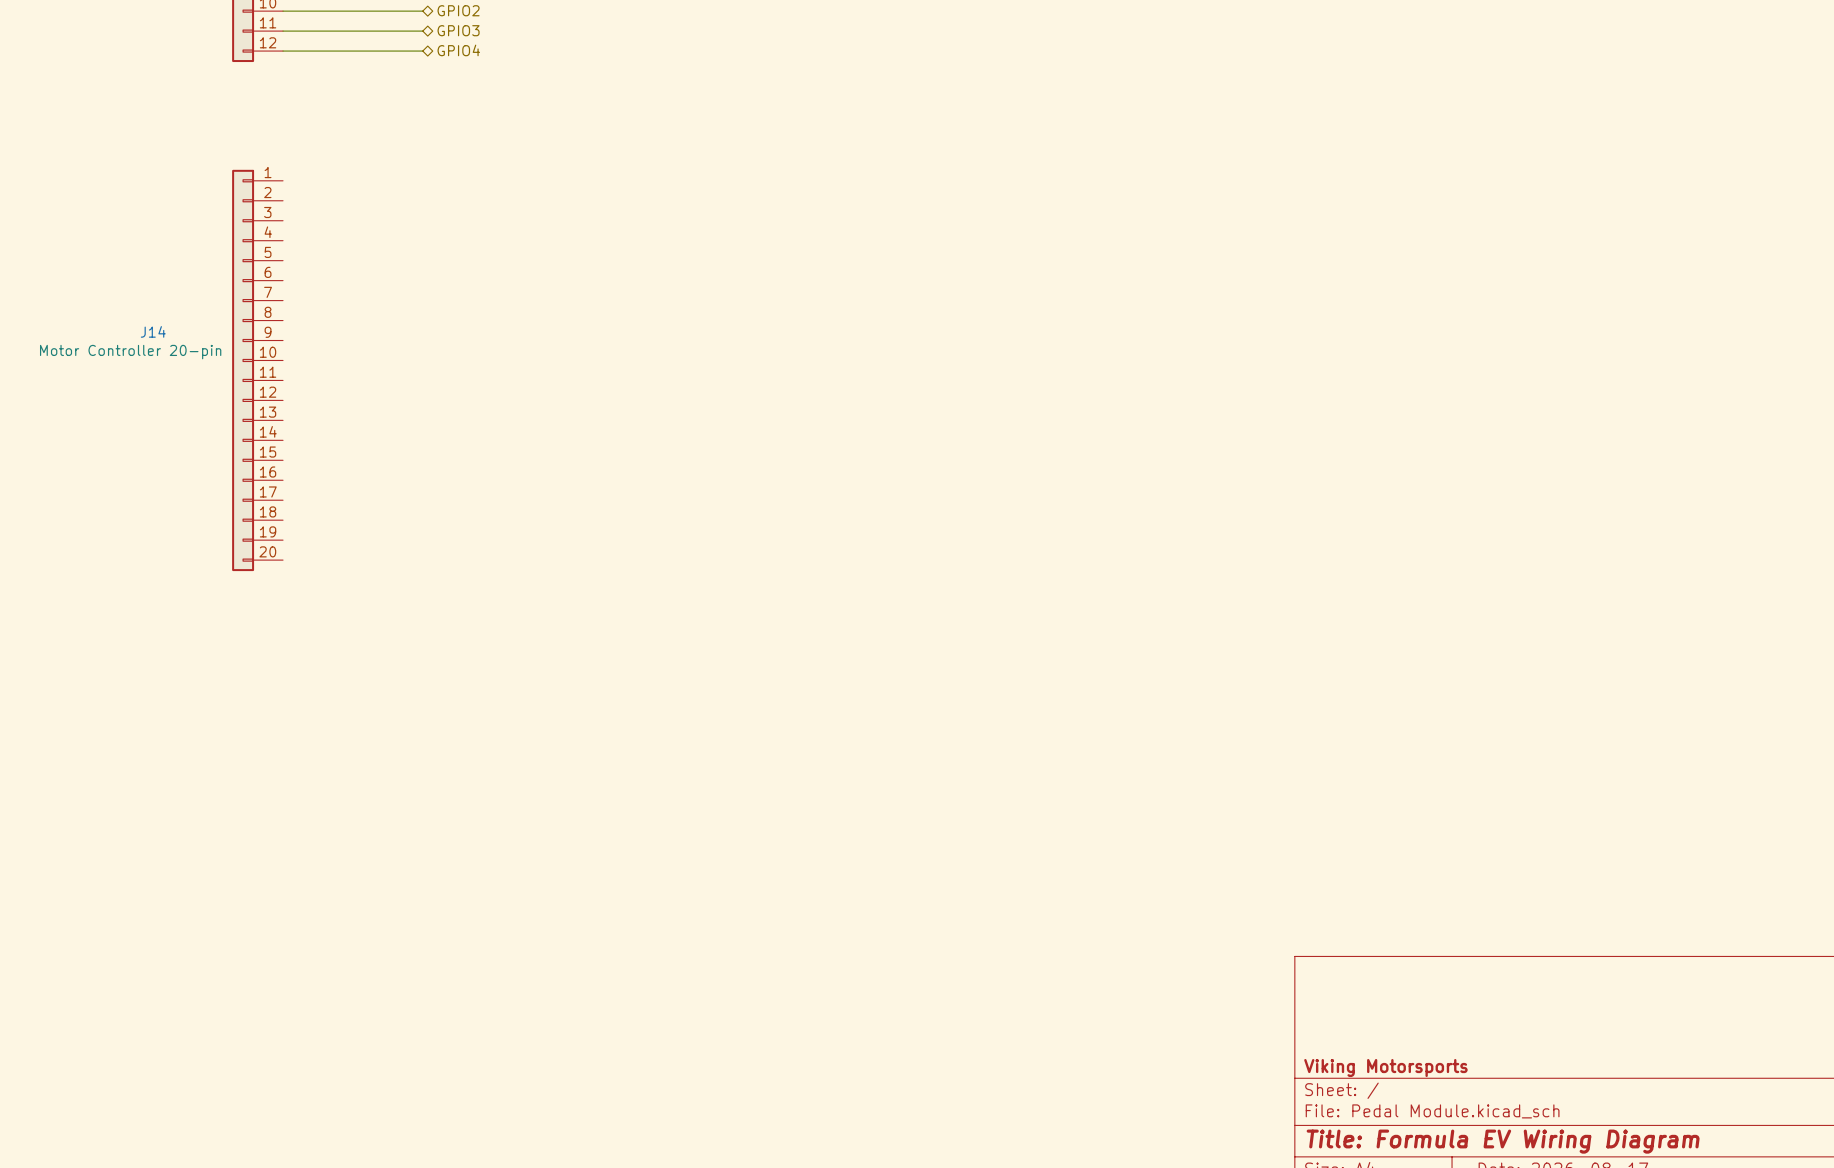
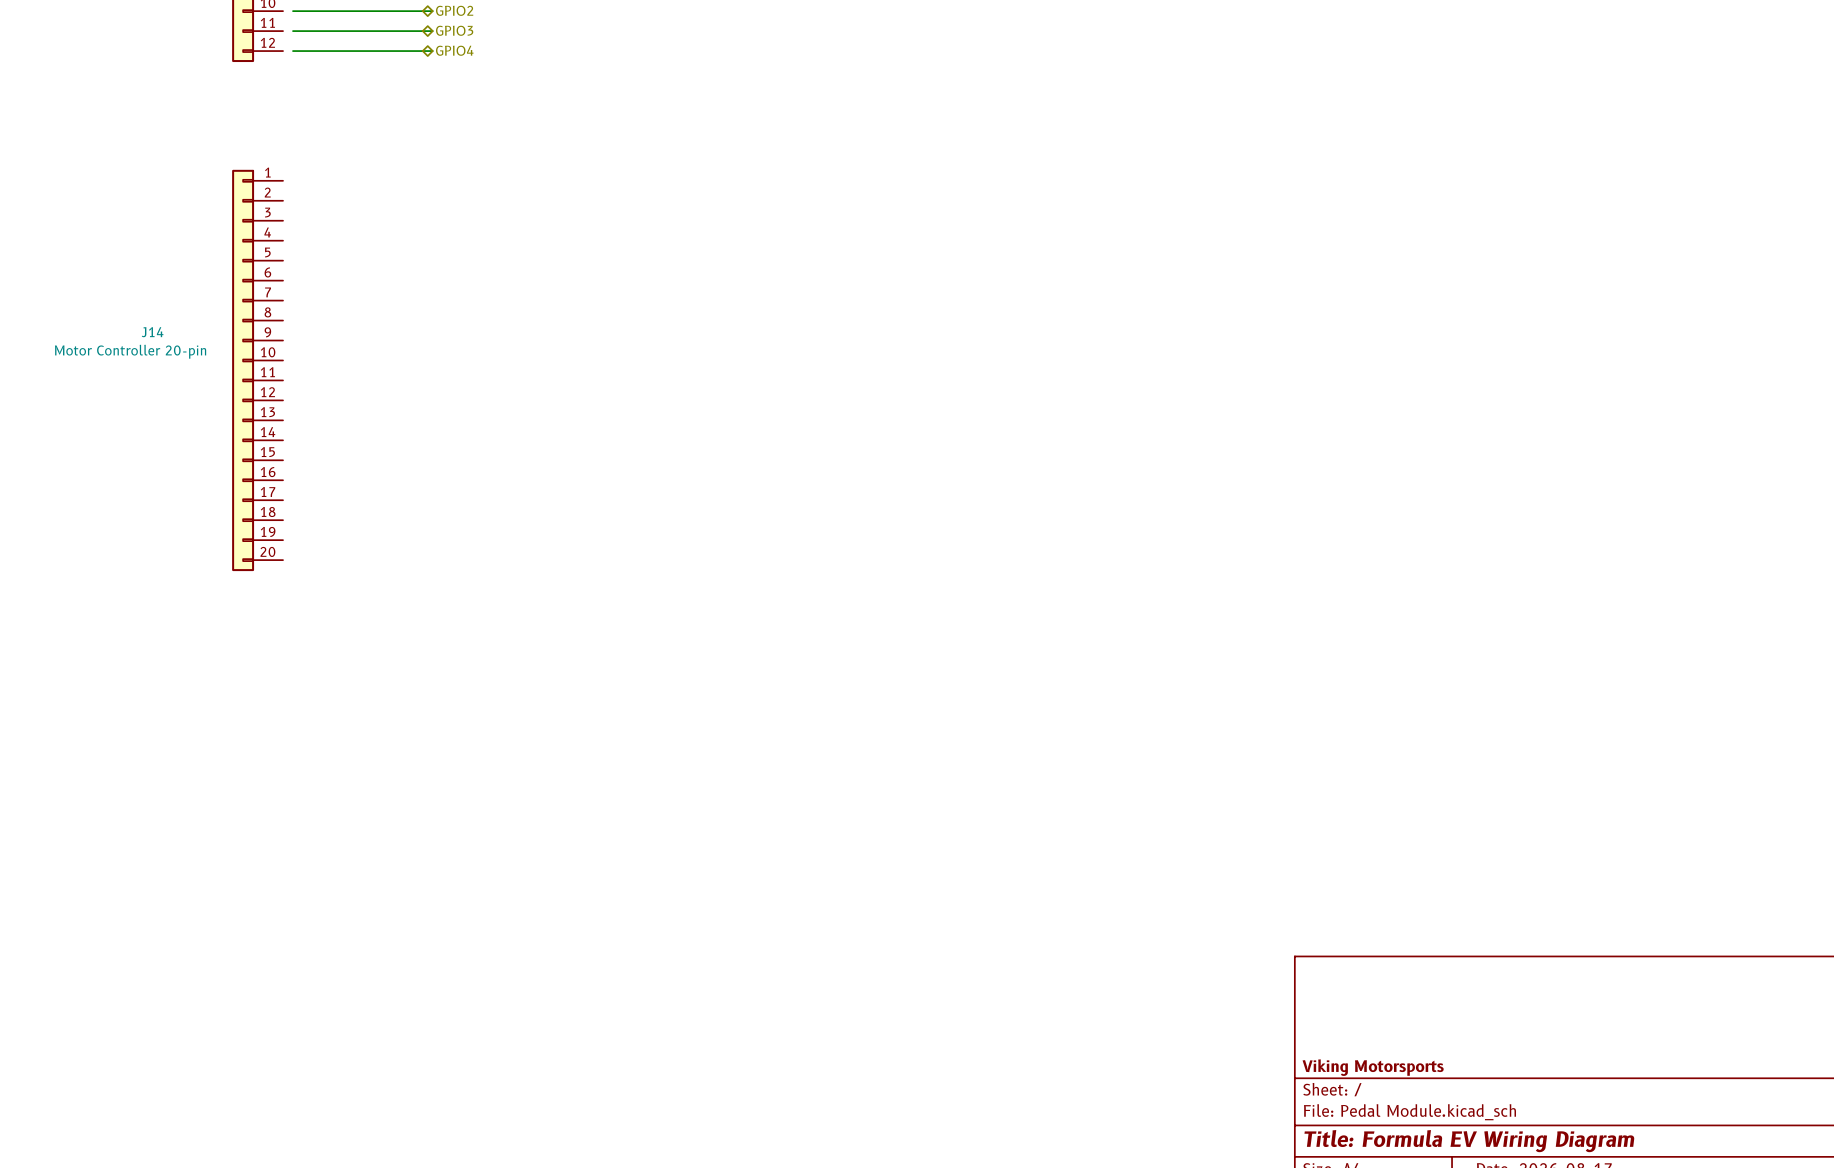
wire: (283, 11) (293, 11) -> (422, 11) (432, 11)
wire: (283, 31) (293, 31) -> (422, 31) (432, 31)
wire: (283, 51) (293, 51) -> (422, 51) (432, 51)

